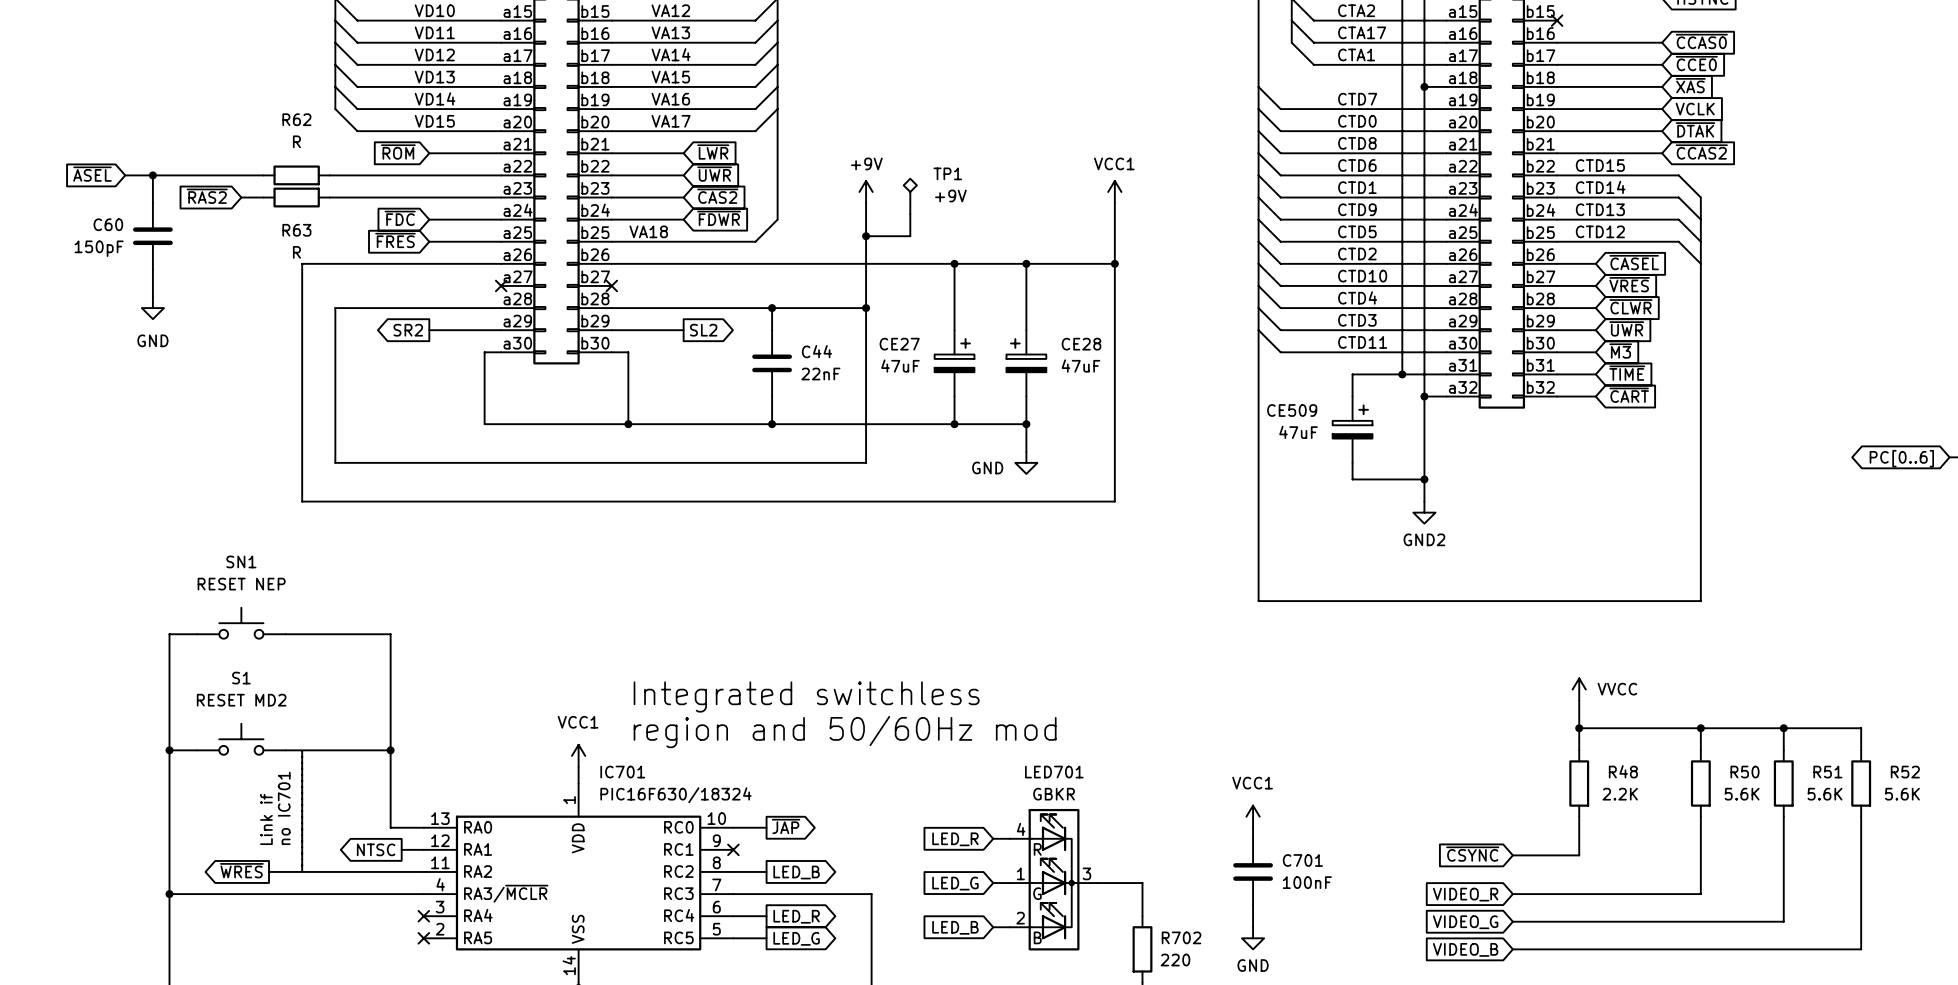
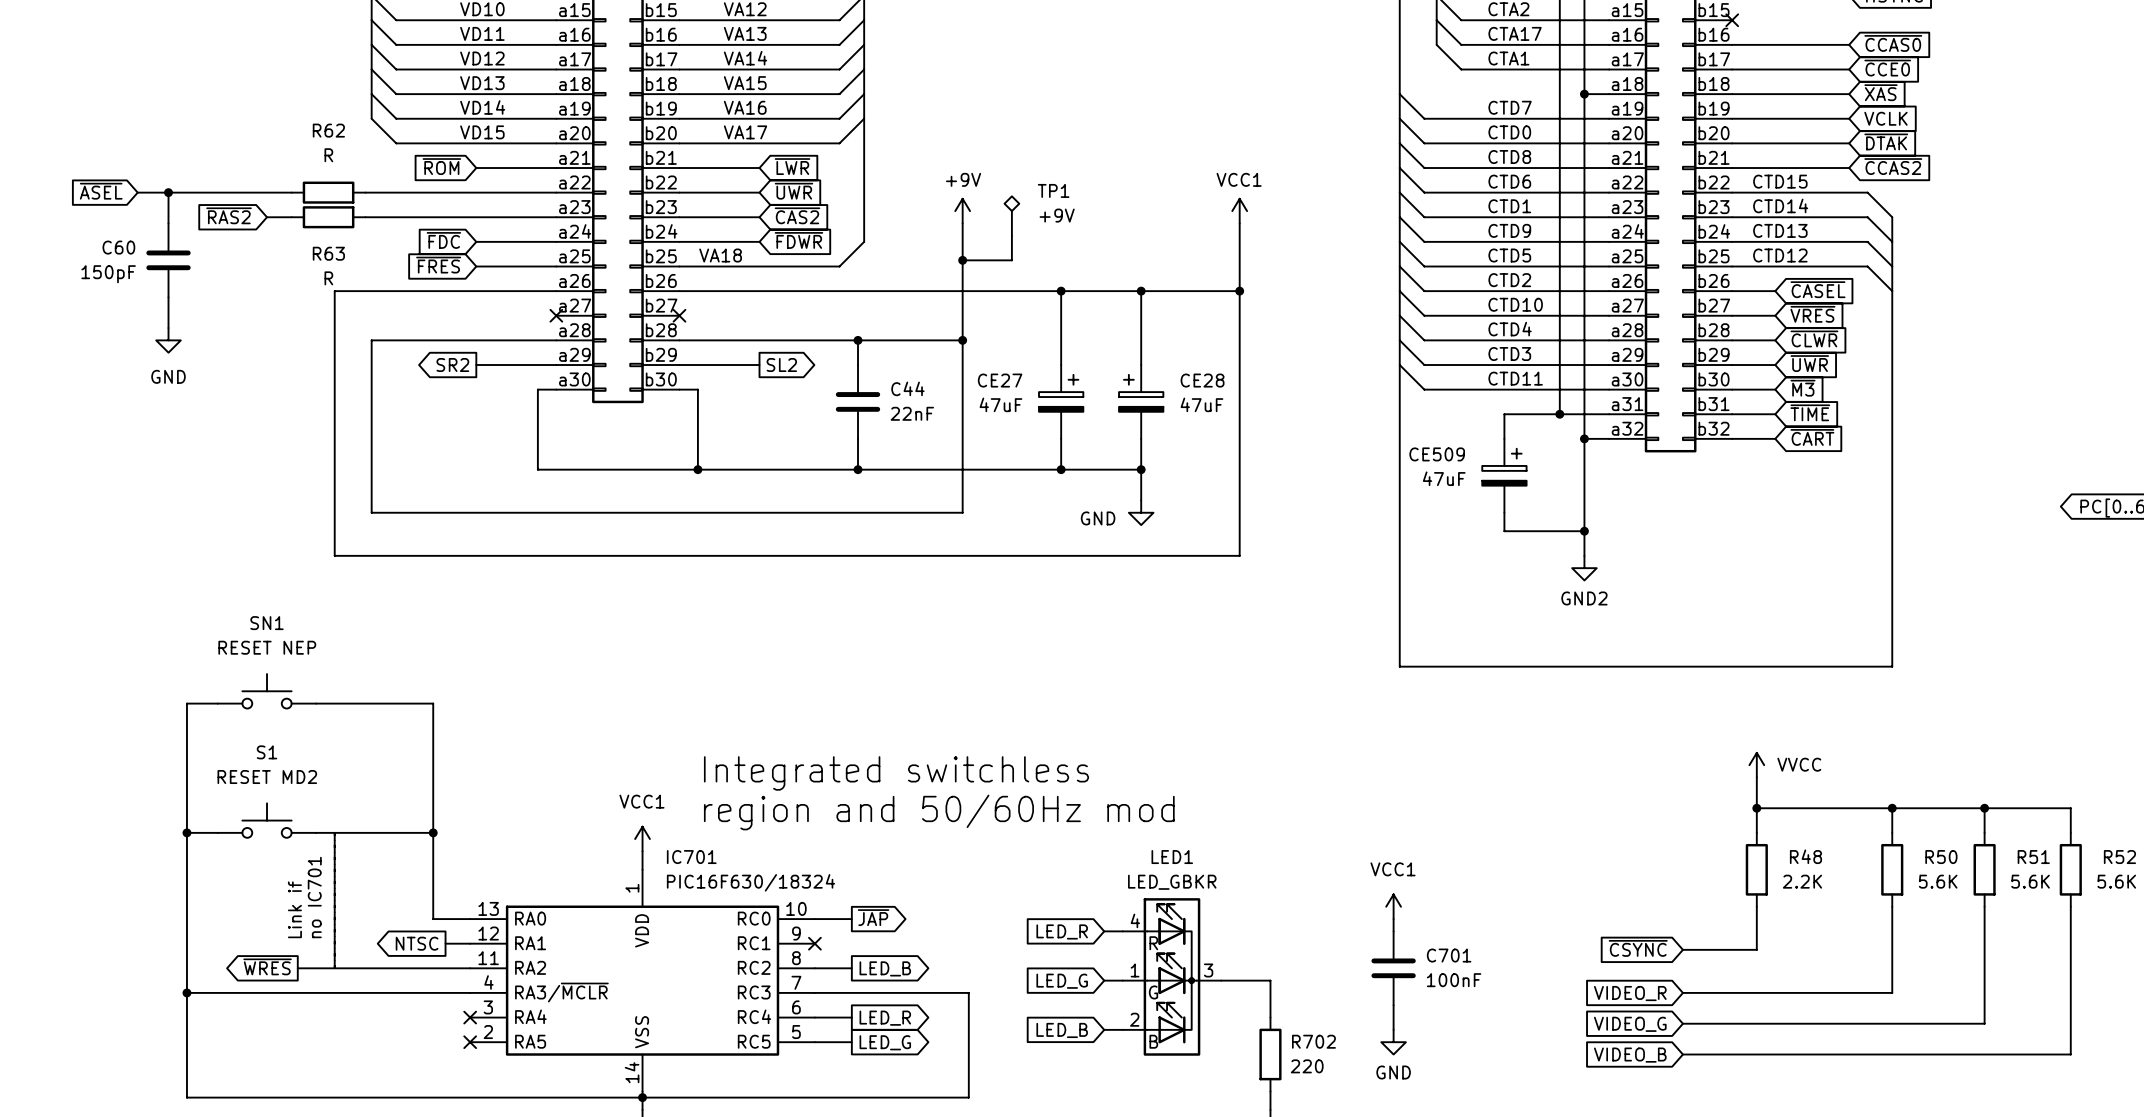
LED701 name: LED701 (1054, 772) -> LED1 (1172, 857)
LED701 value: GBKR (1054, 794) -> LED_GBKR (1172, 882)

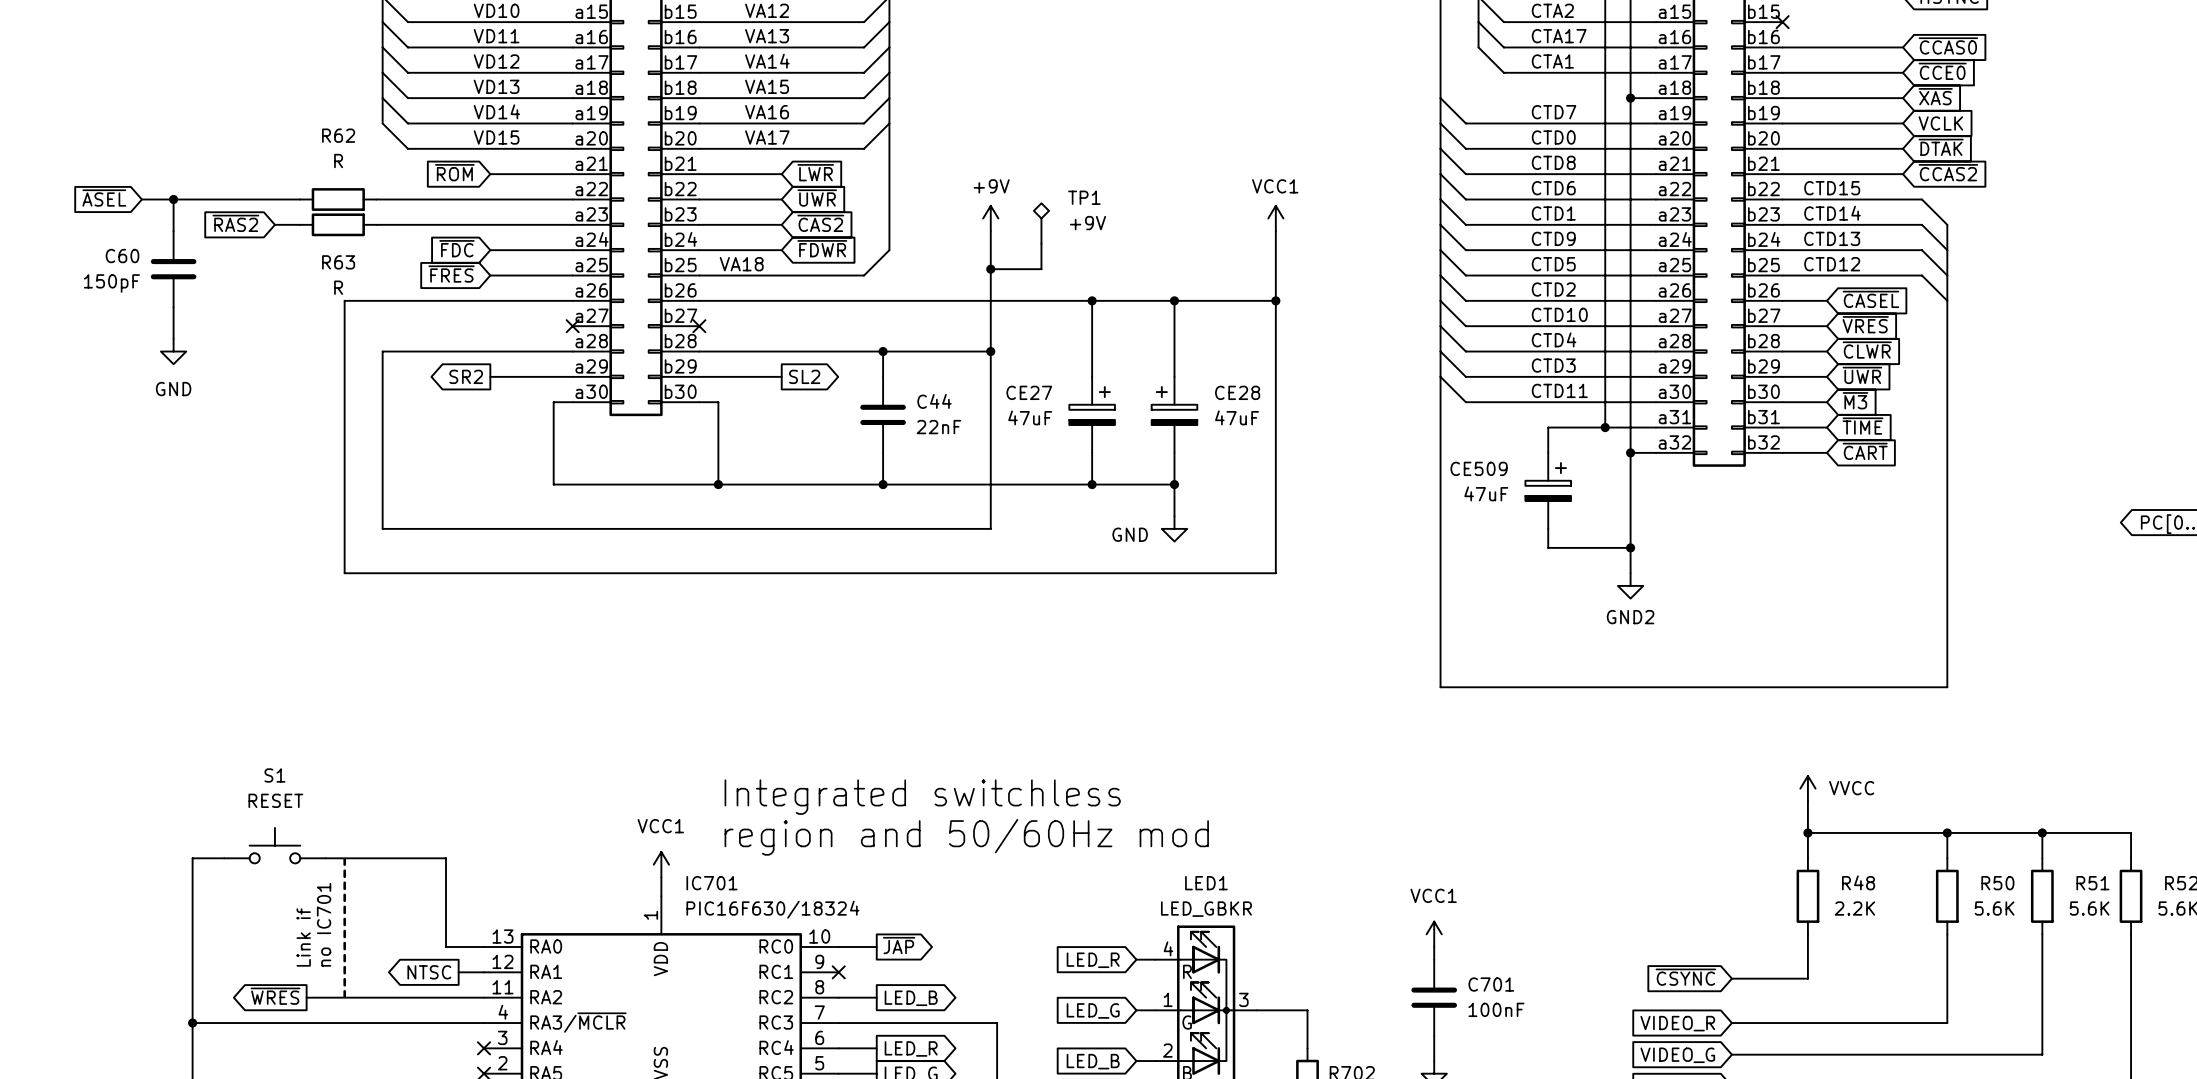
SN1: RESET NEP (267, 691) -> none
wire: (217, 703) (186, 703) (186, 832) -> none
wire: (316, 703) (433, 703) (433, 832) -> none
S1 value: RESET MD2 (267, 777) -> RESET (275, 800)
junction: (186, 832) -> none
junction: (433, 832) -> none

